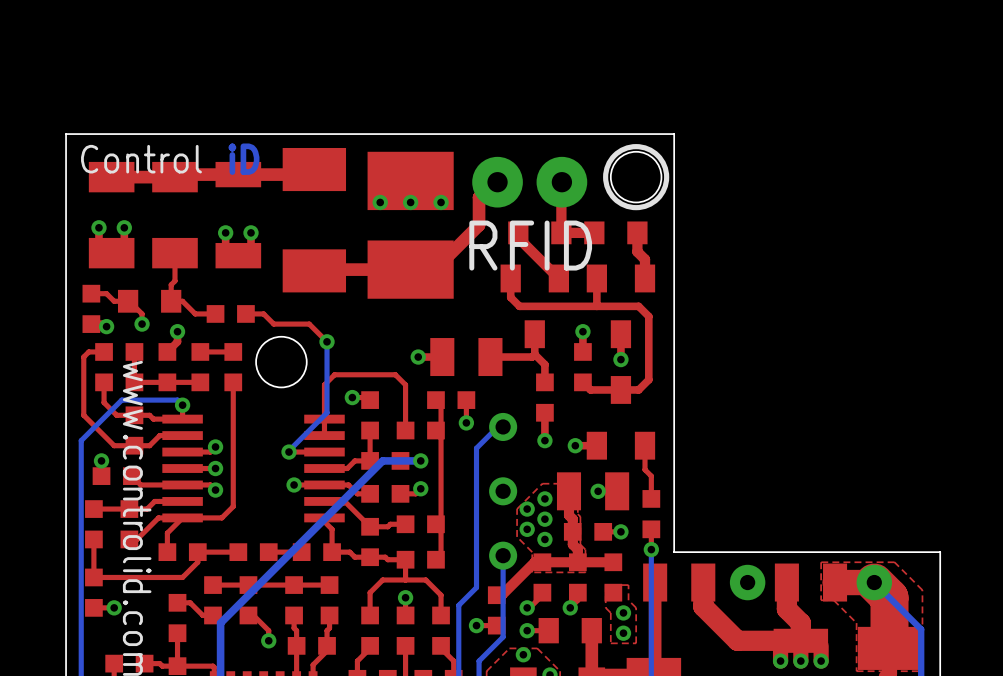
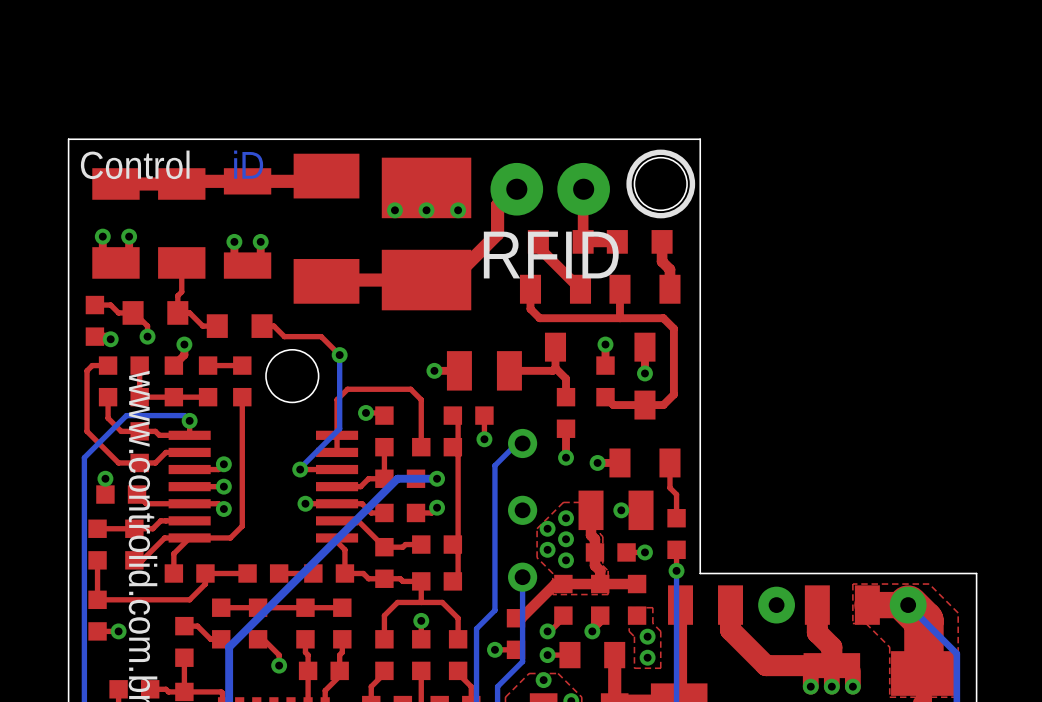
part footprint: [206, 305, 255, 323] -> [206, 314, 273, 338]

